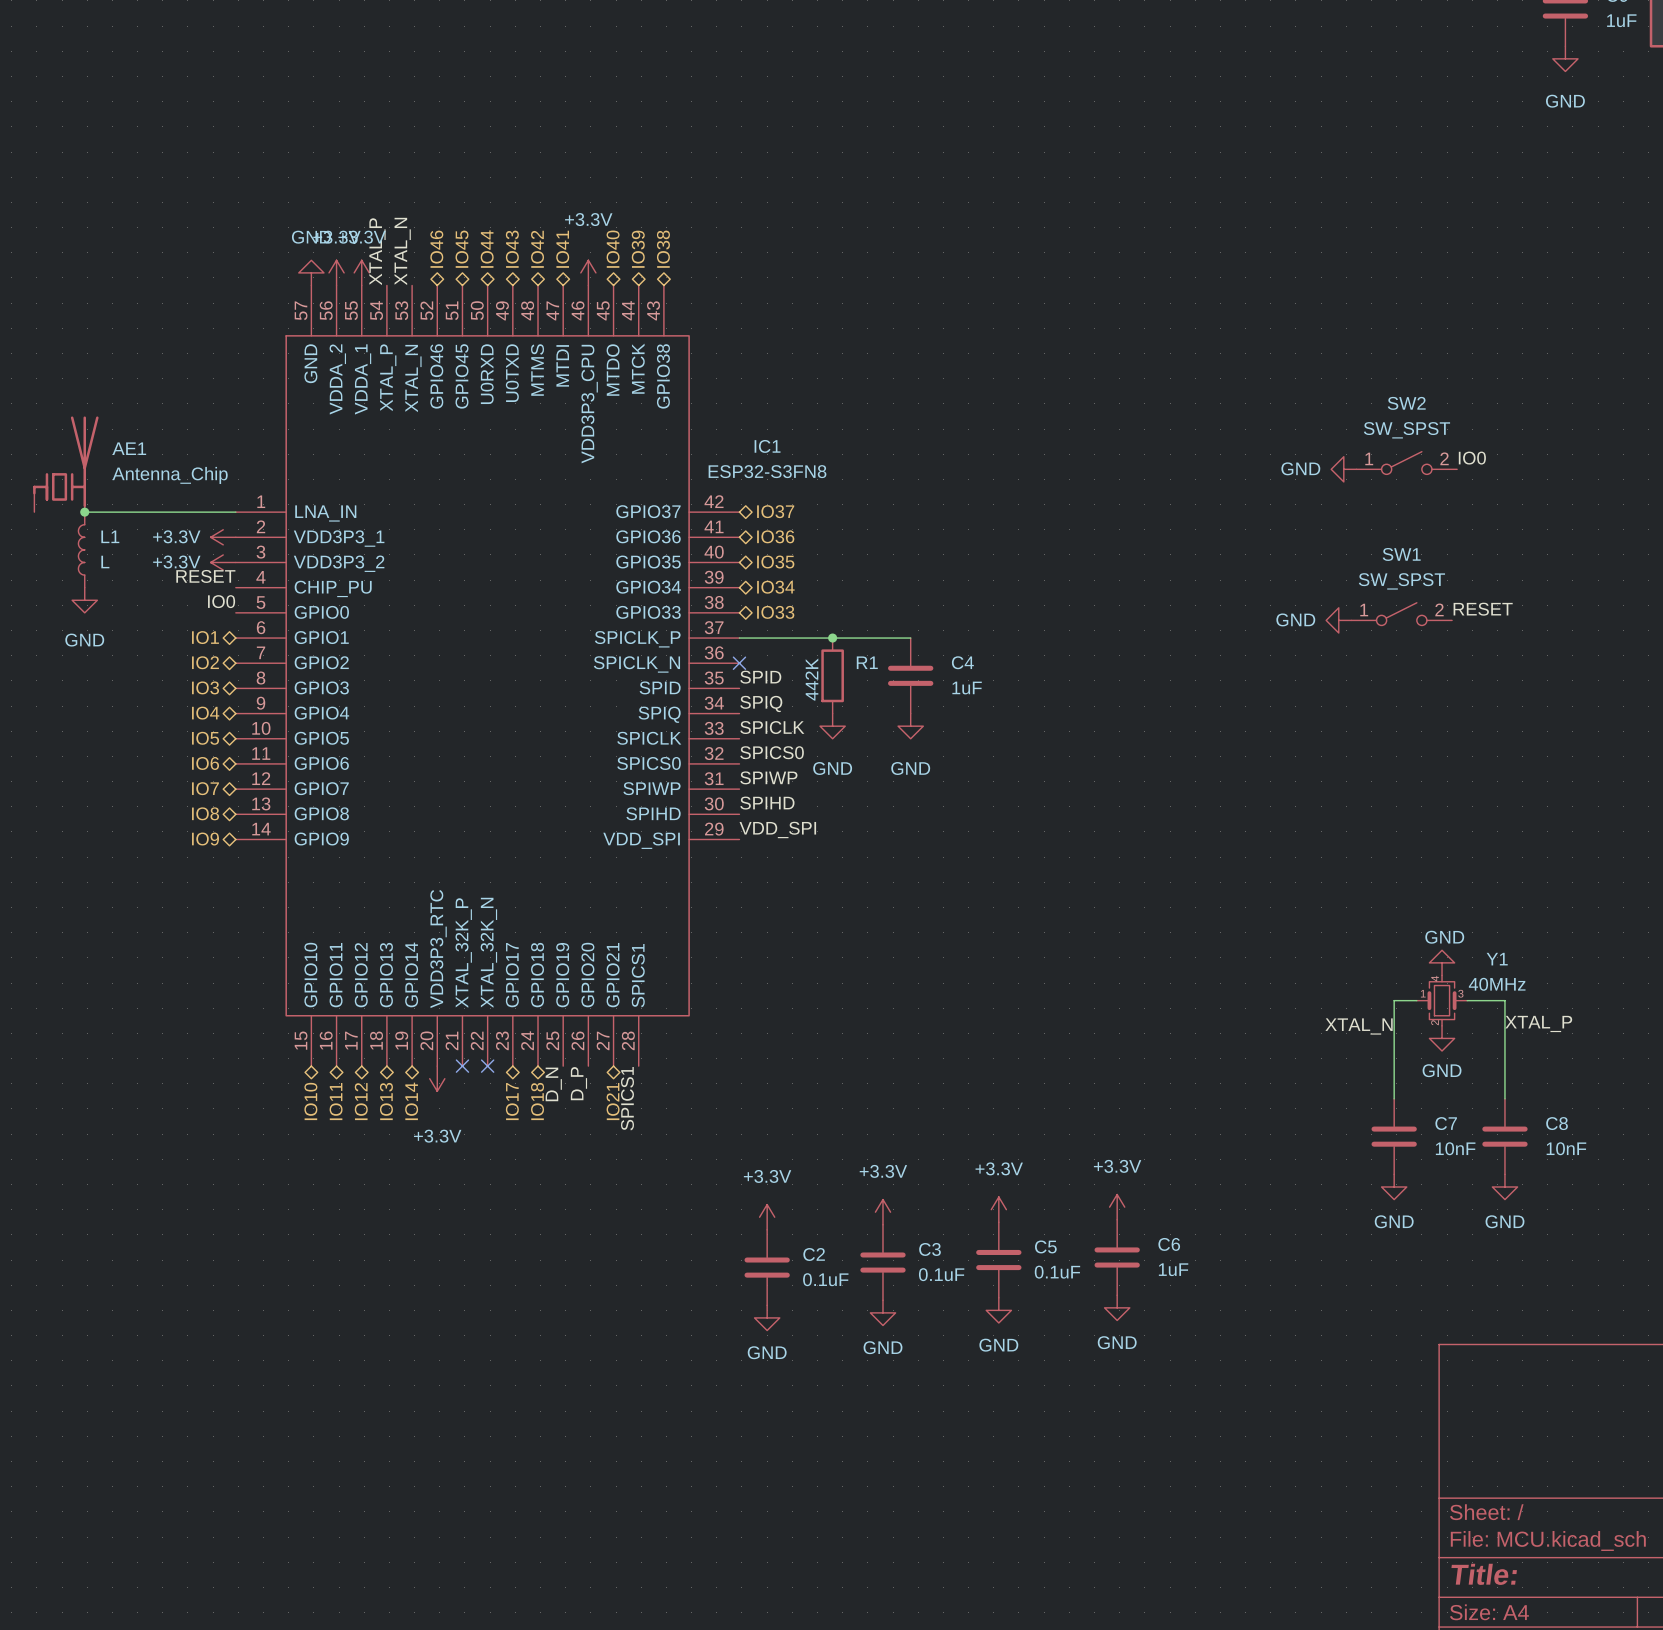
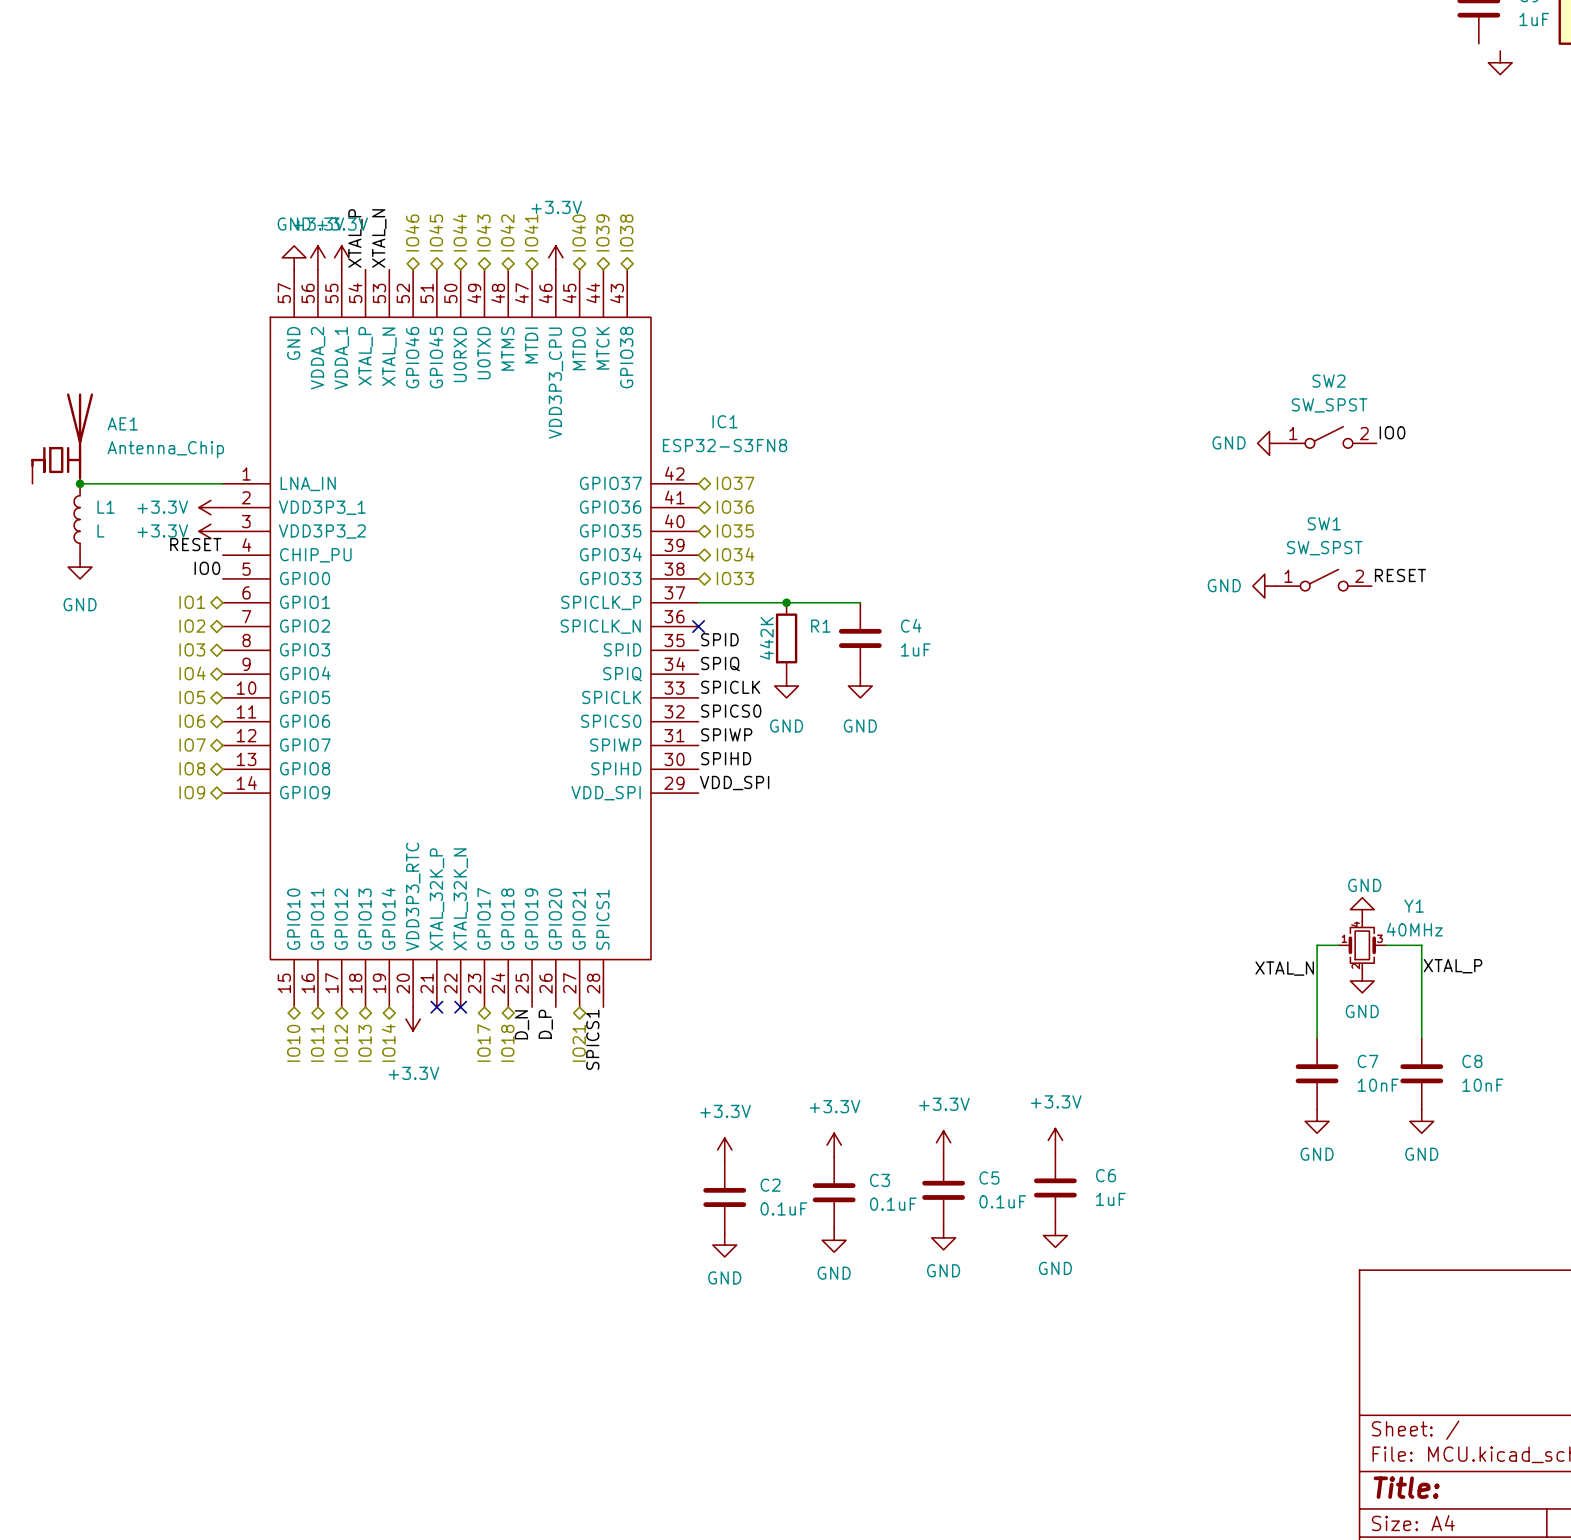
power symbol: GND (1565, 58) -> none
power symbol: none -> (1500, 62)

